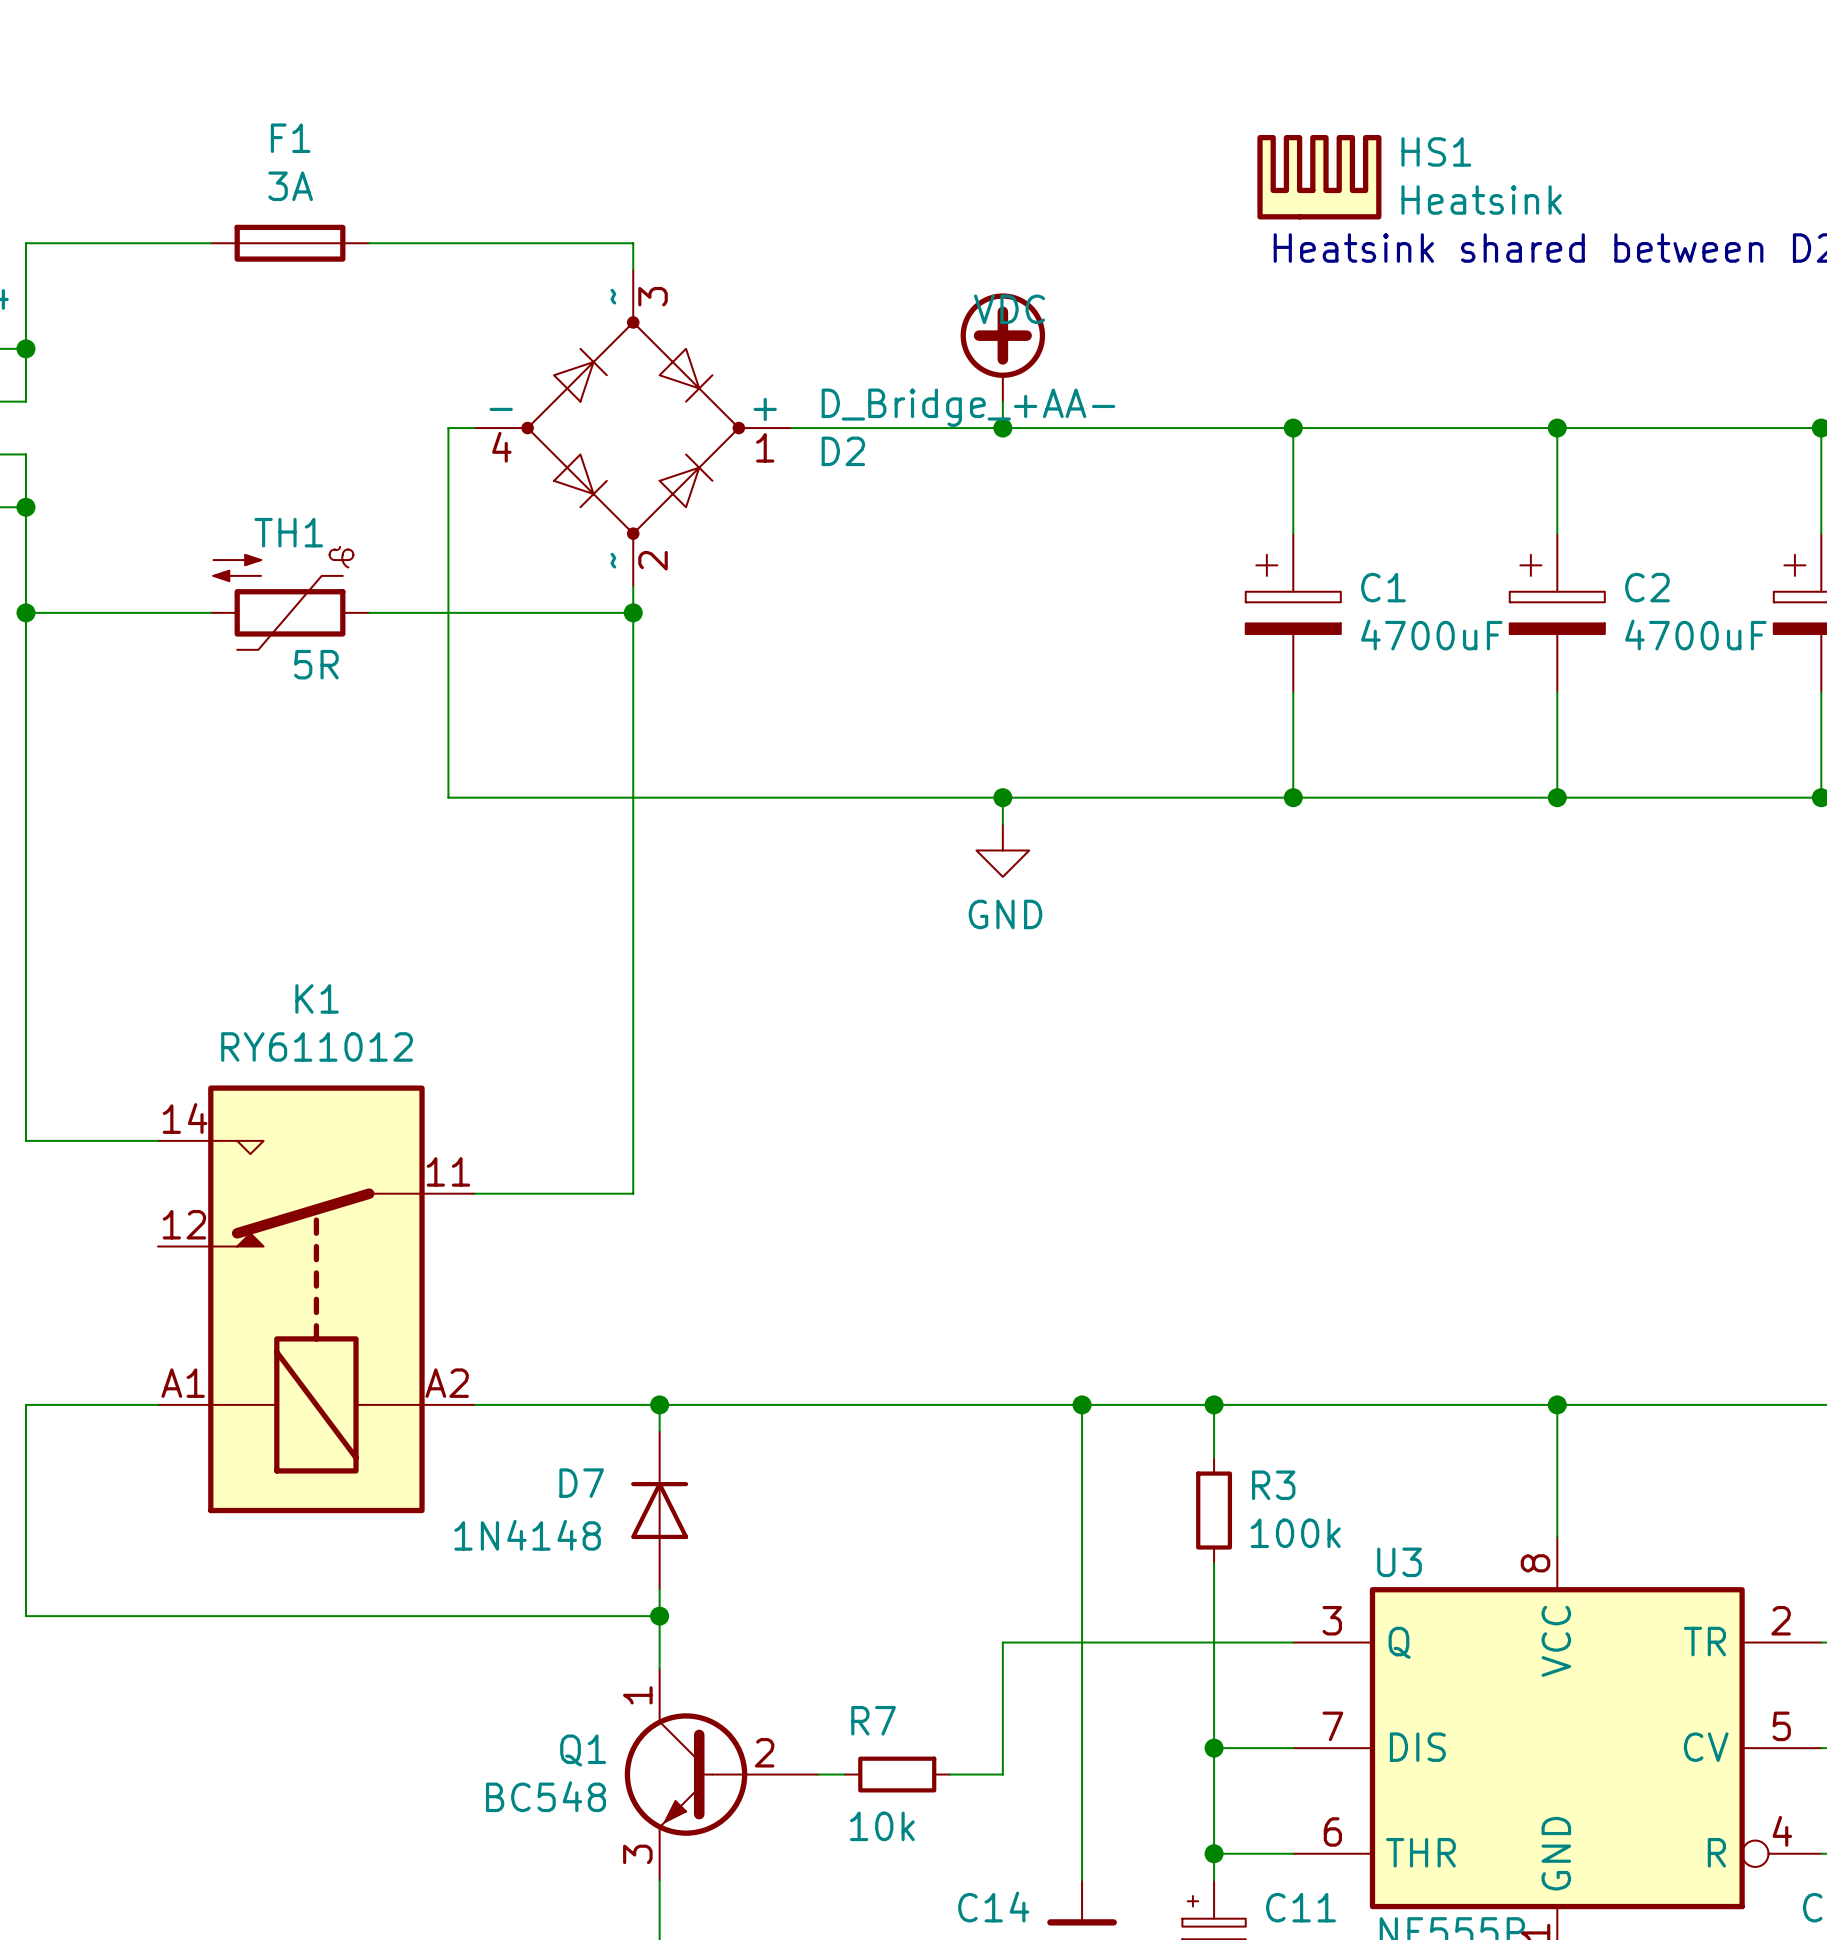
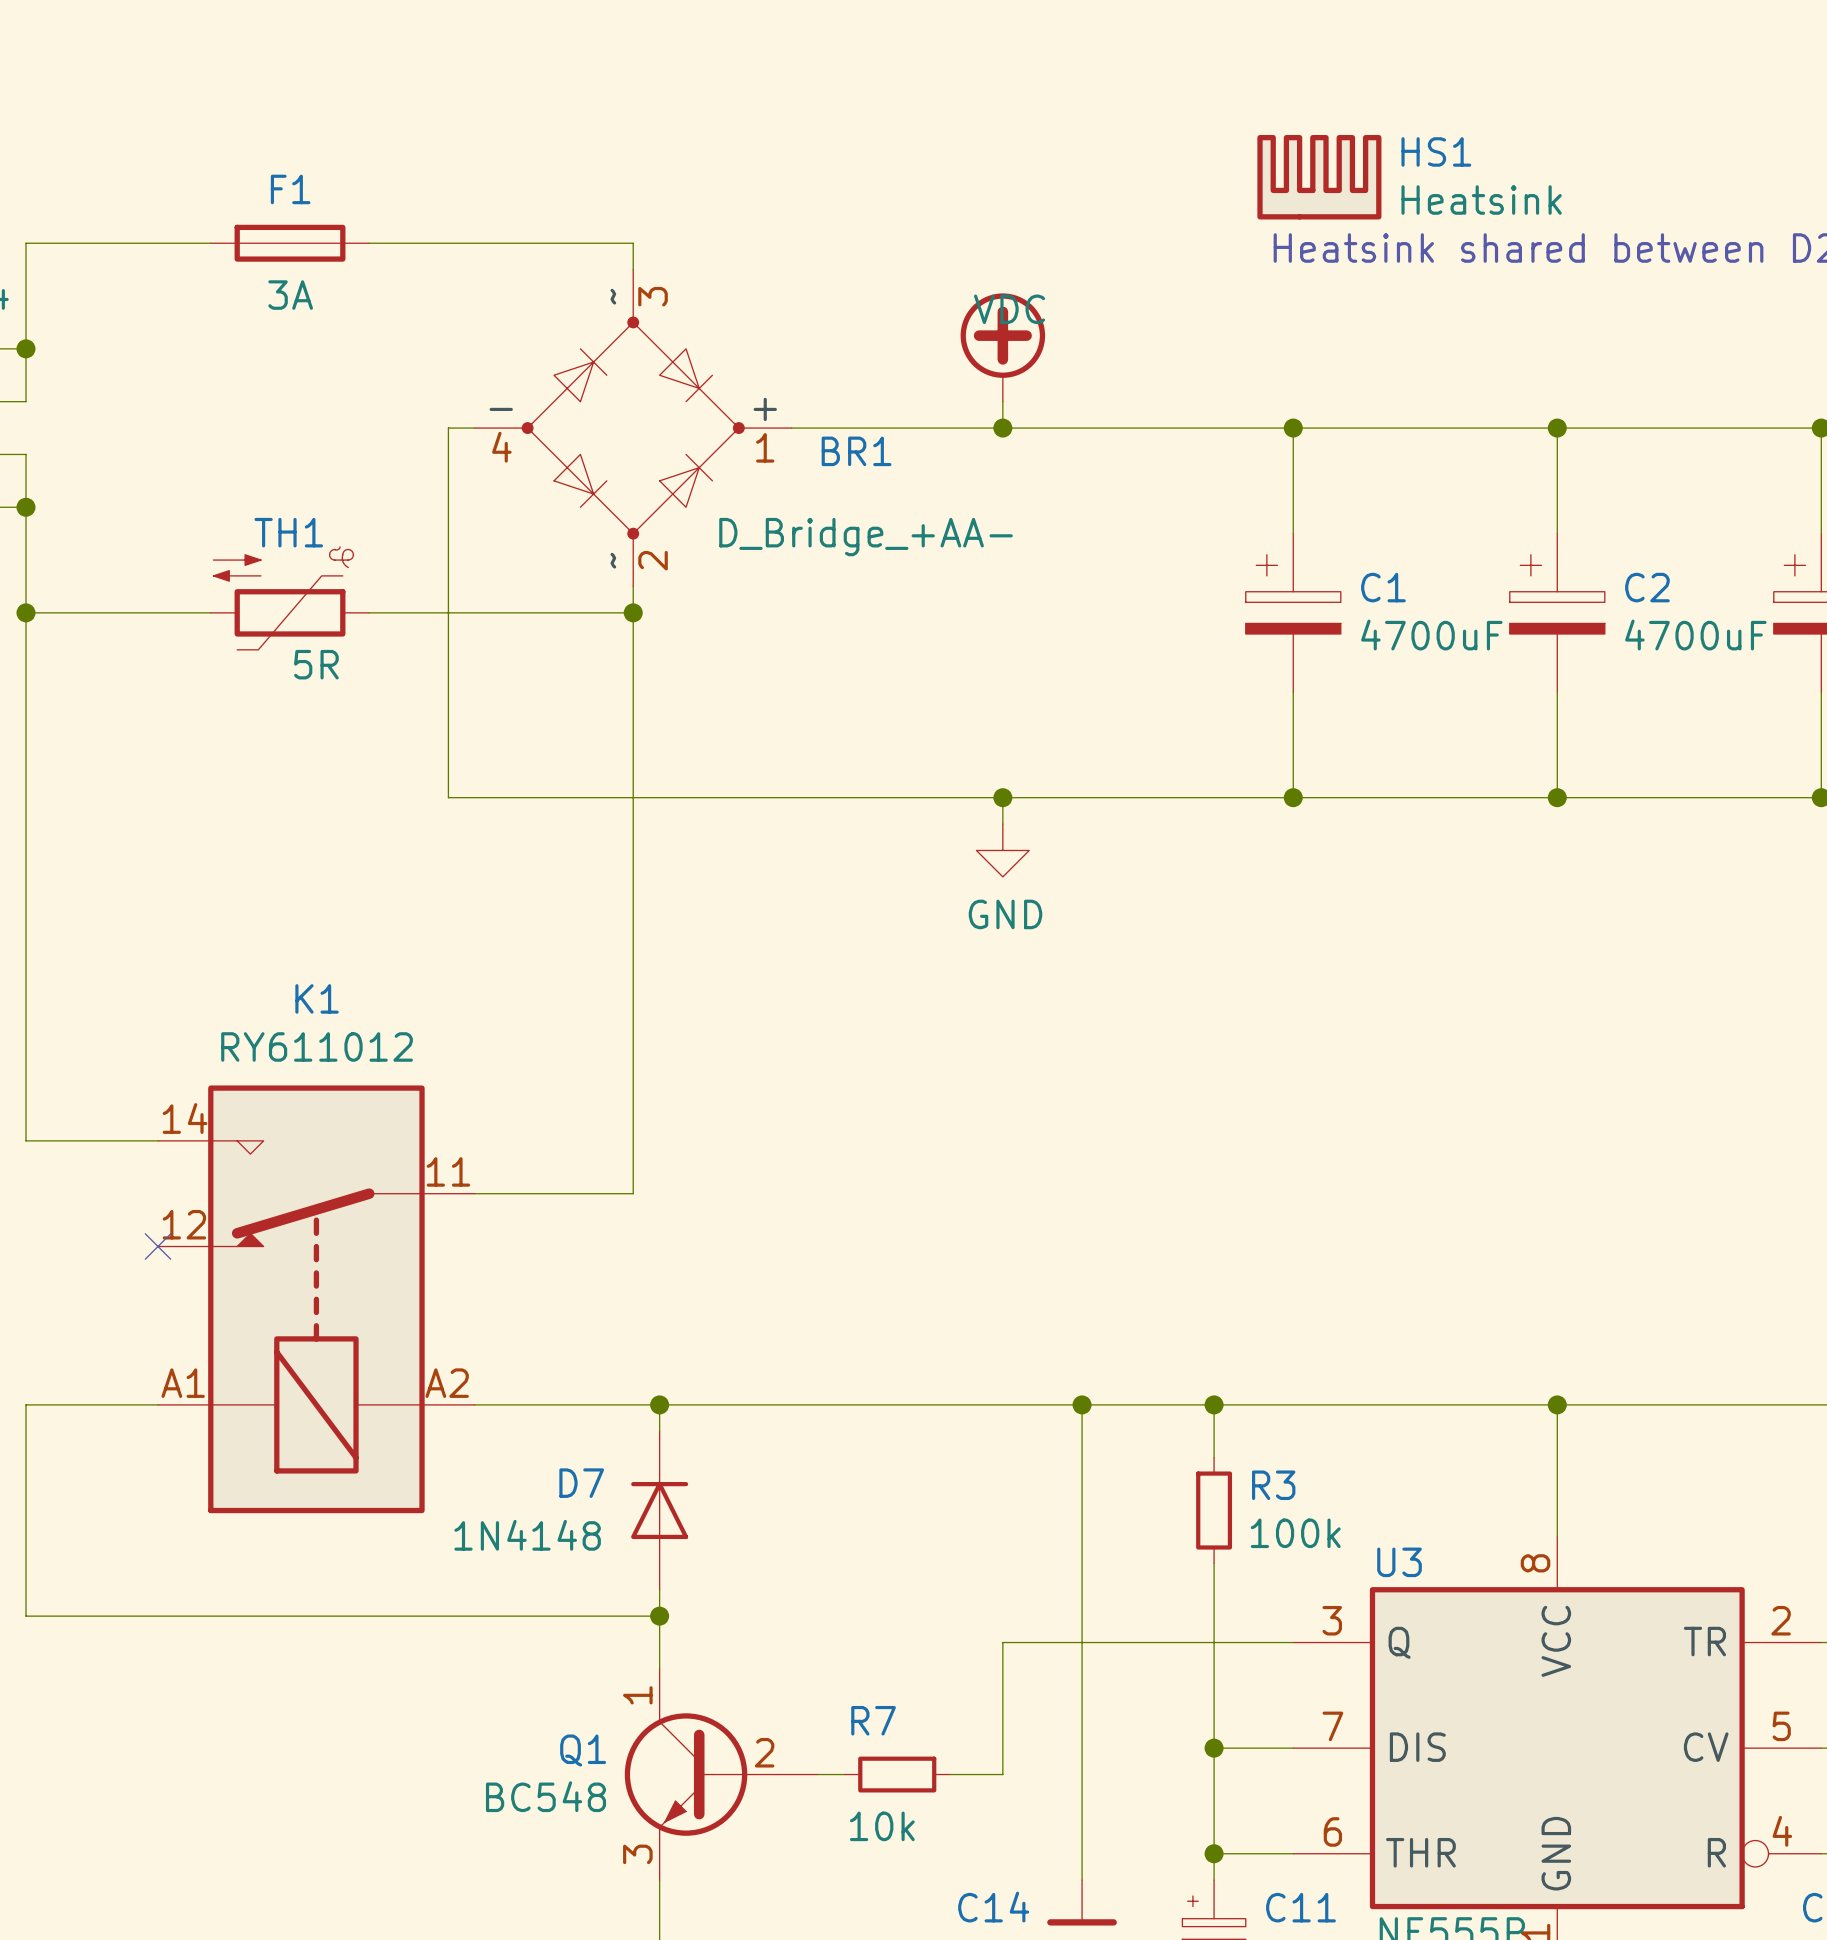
F1 name position: F1 (290, 138) -> F1 (290, 189)
F1 value position: 3A (290, 186) -> 3A (290, 295)
D2 value position: D_Bridge_+AA- (968, 407) -> D_Bridge_+AA- (866, 537)
D2 name: D2 (843, 451) -> BR1 (856, 451)
no-connect mark: none -> (158, 1246)

